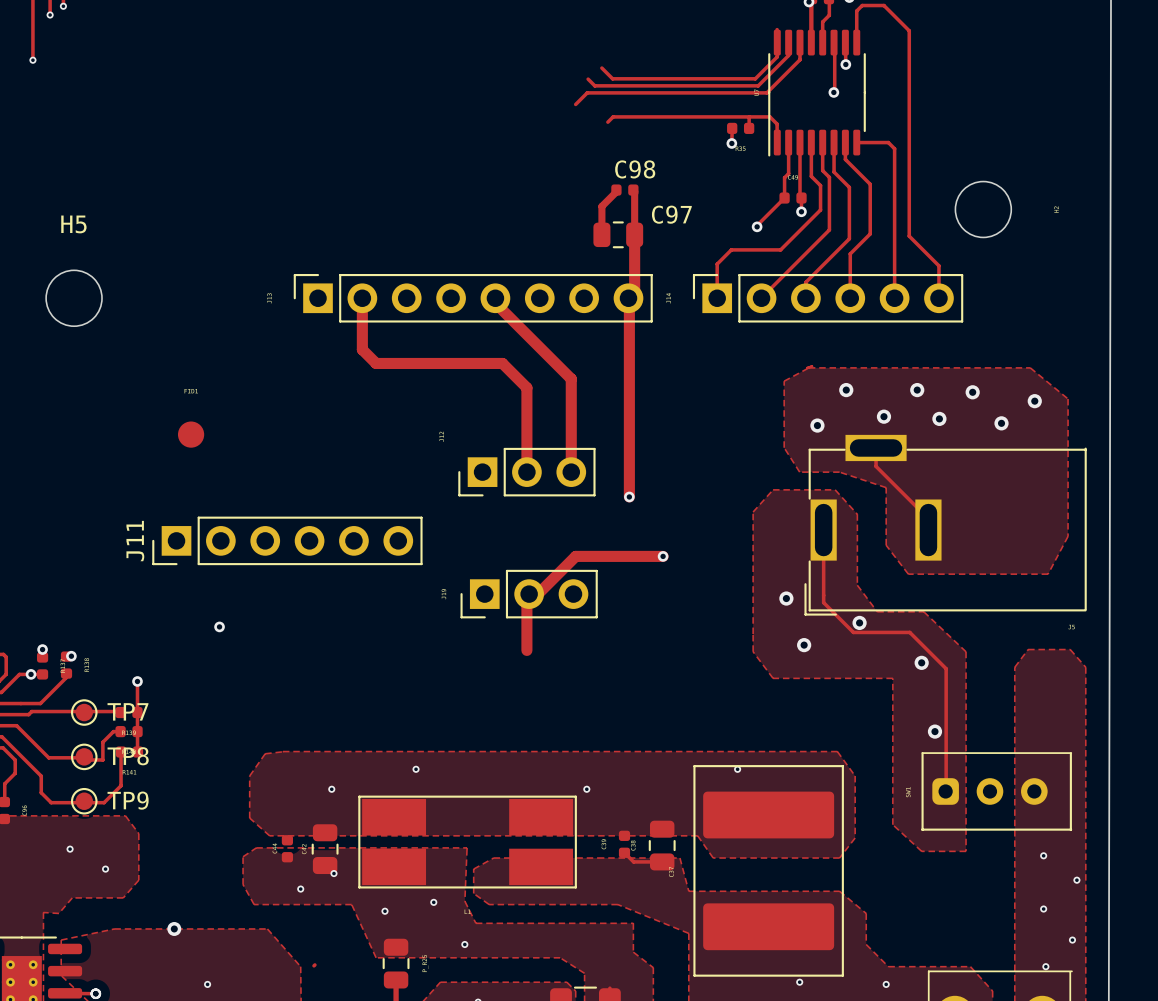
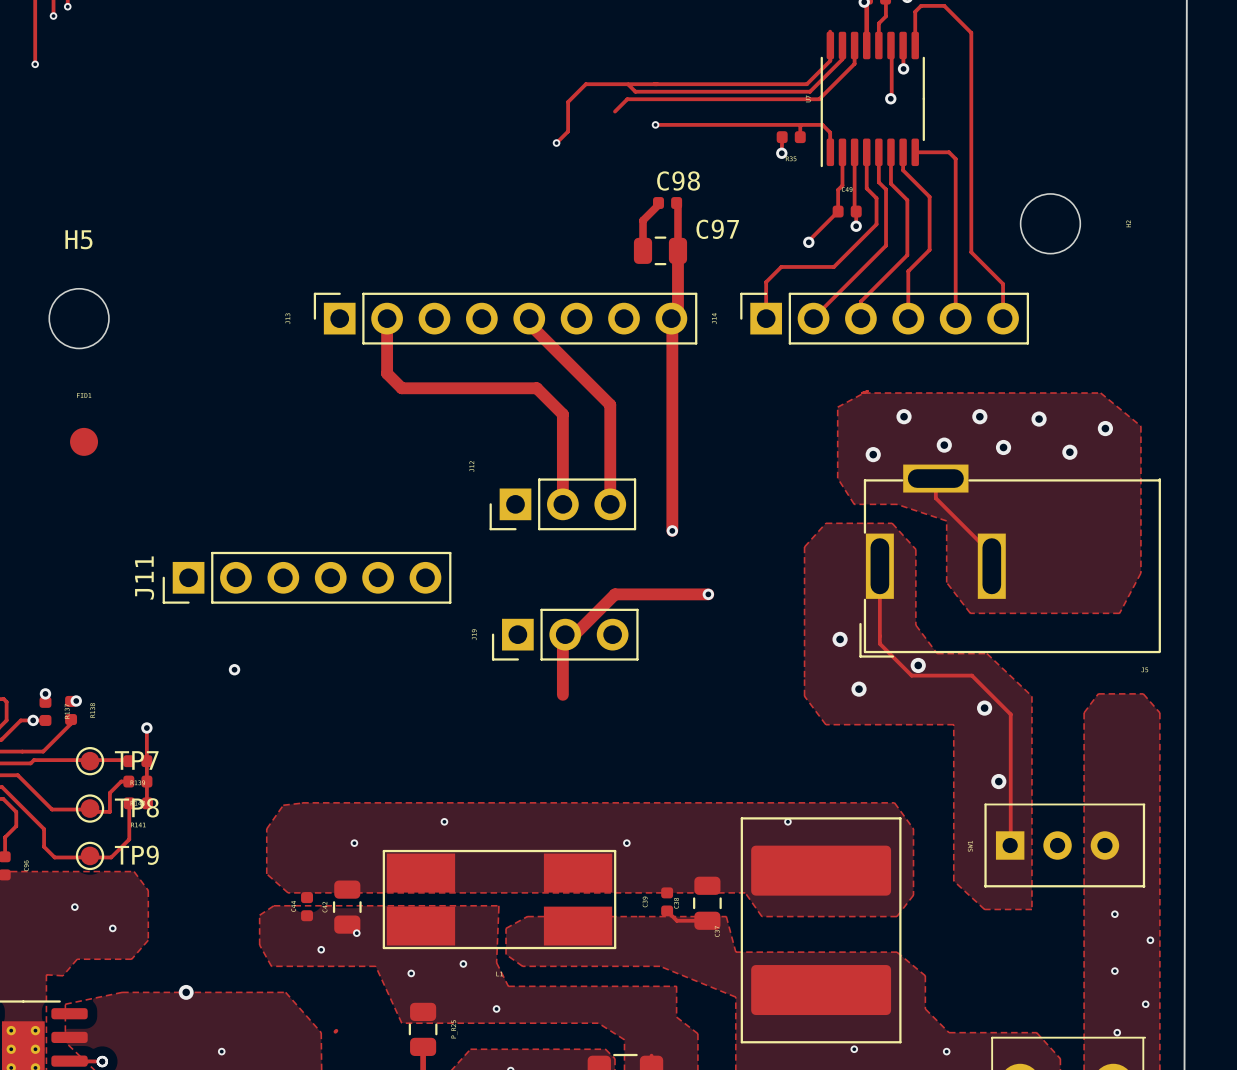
track: (601, 68) (612, 78) -> (556, 143) (568, 131) (568, 102) (585, 84) (654, 84)
track: (613, 116) (607, 122) -> none
via: none -> (655, 124)
via: none -> (556, 143)
part position: (191, 434) -> (84, 441)
part footprint: [921, 752, 1073, 832] -> [983, 803, 1146, 888]

